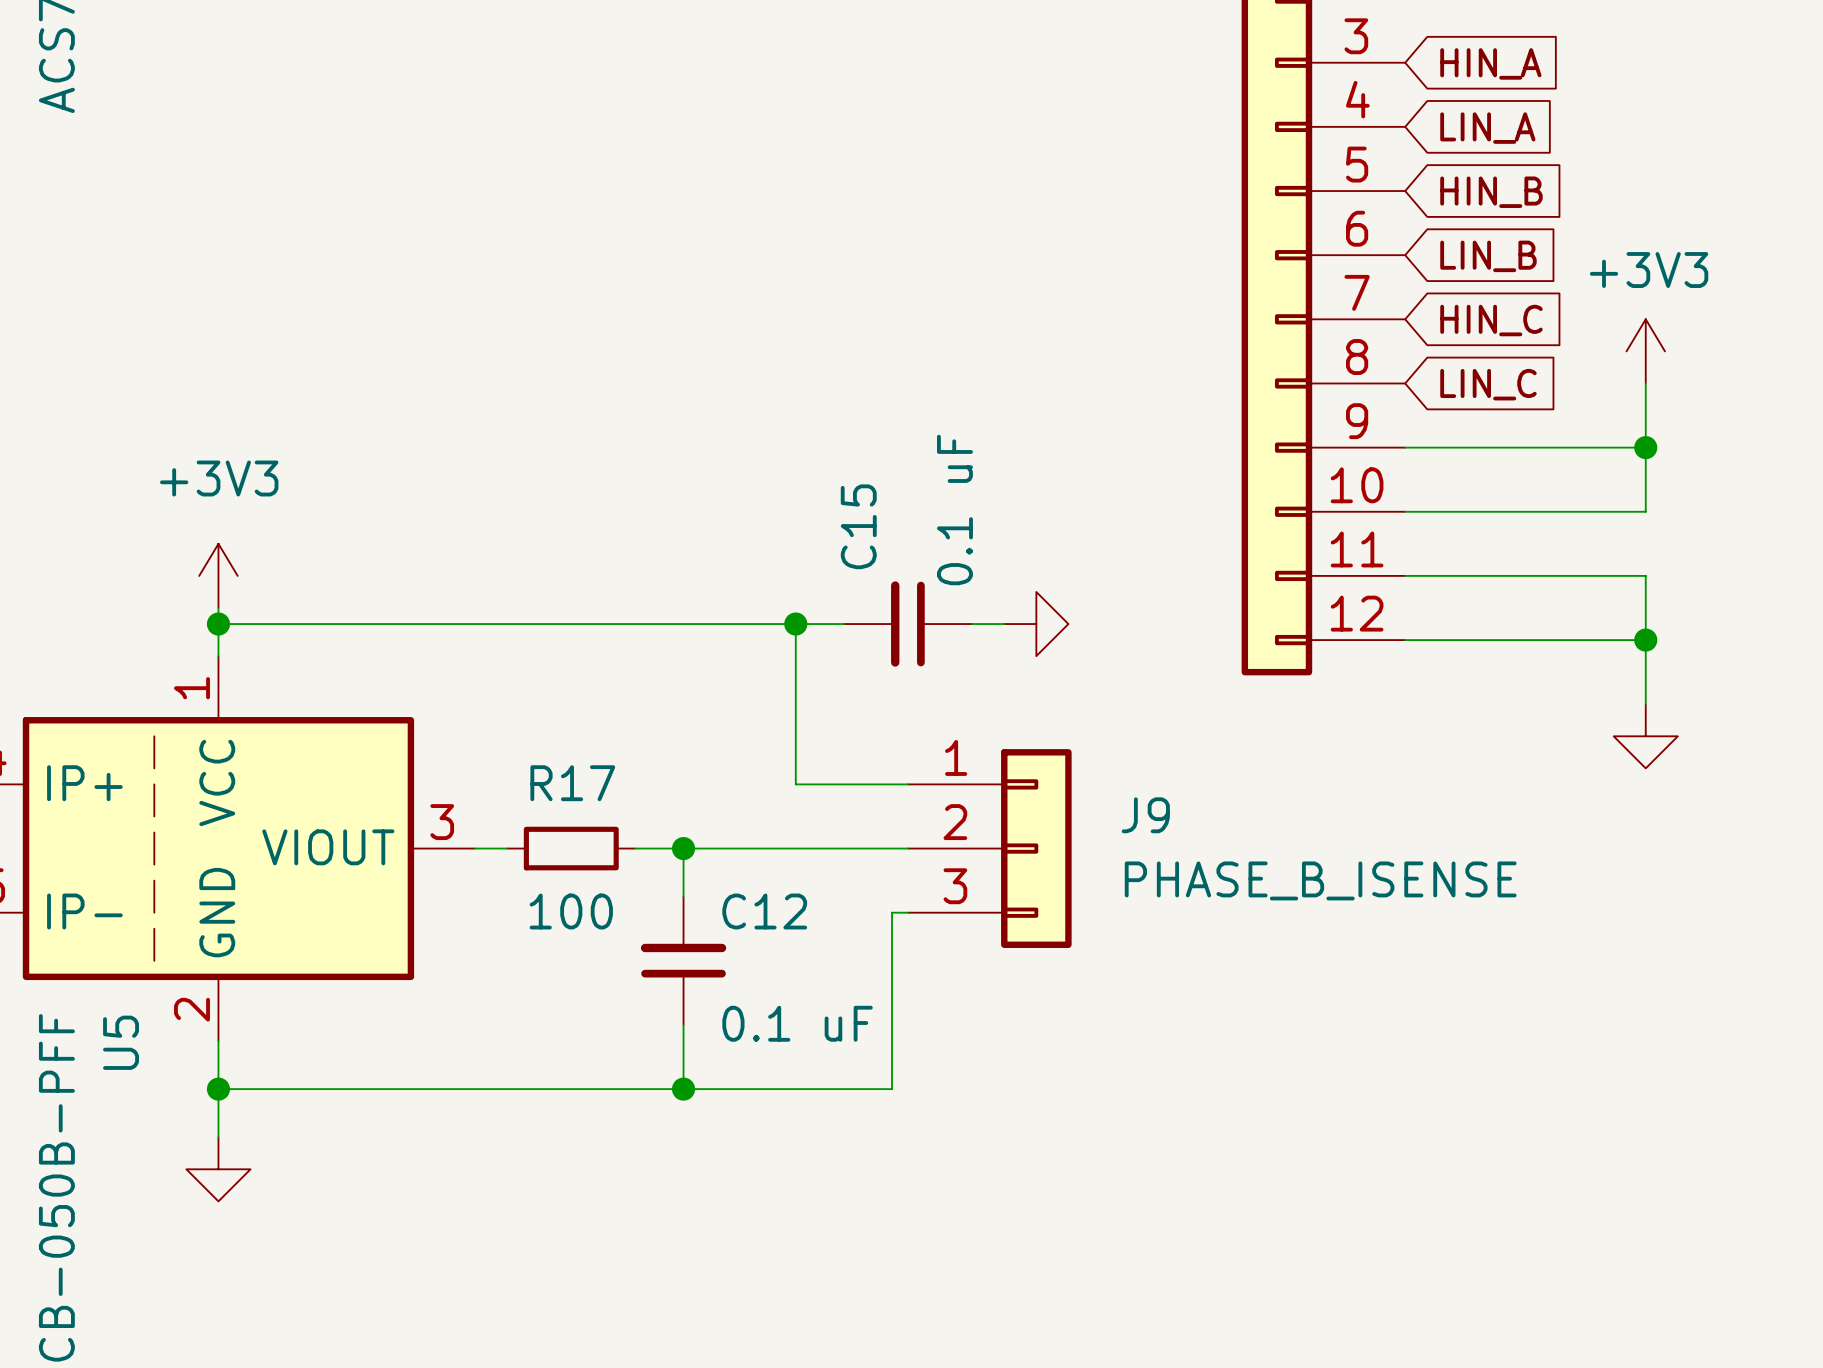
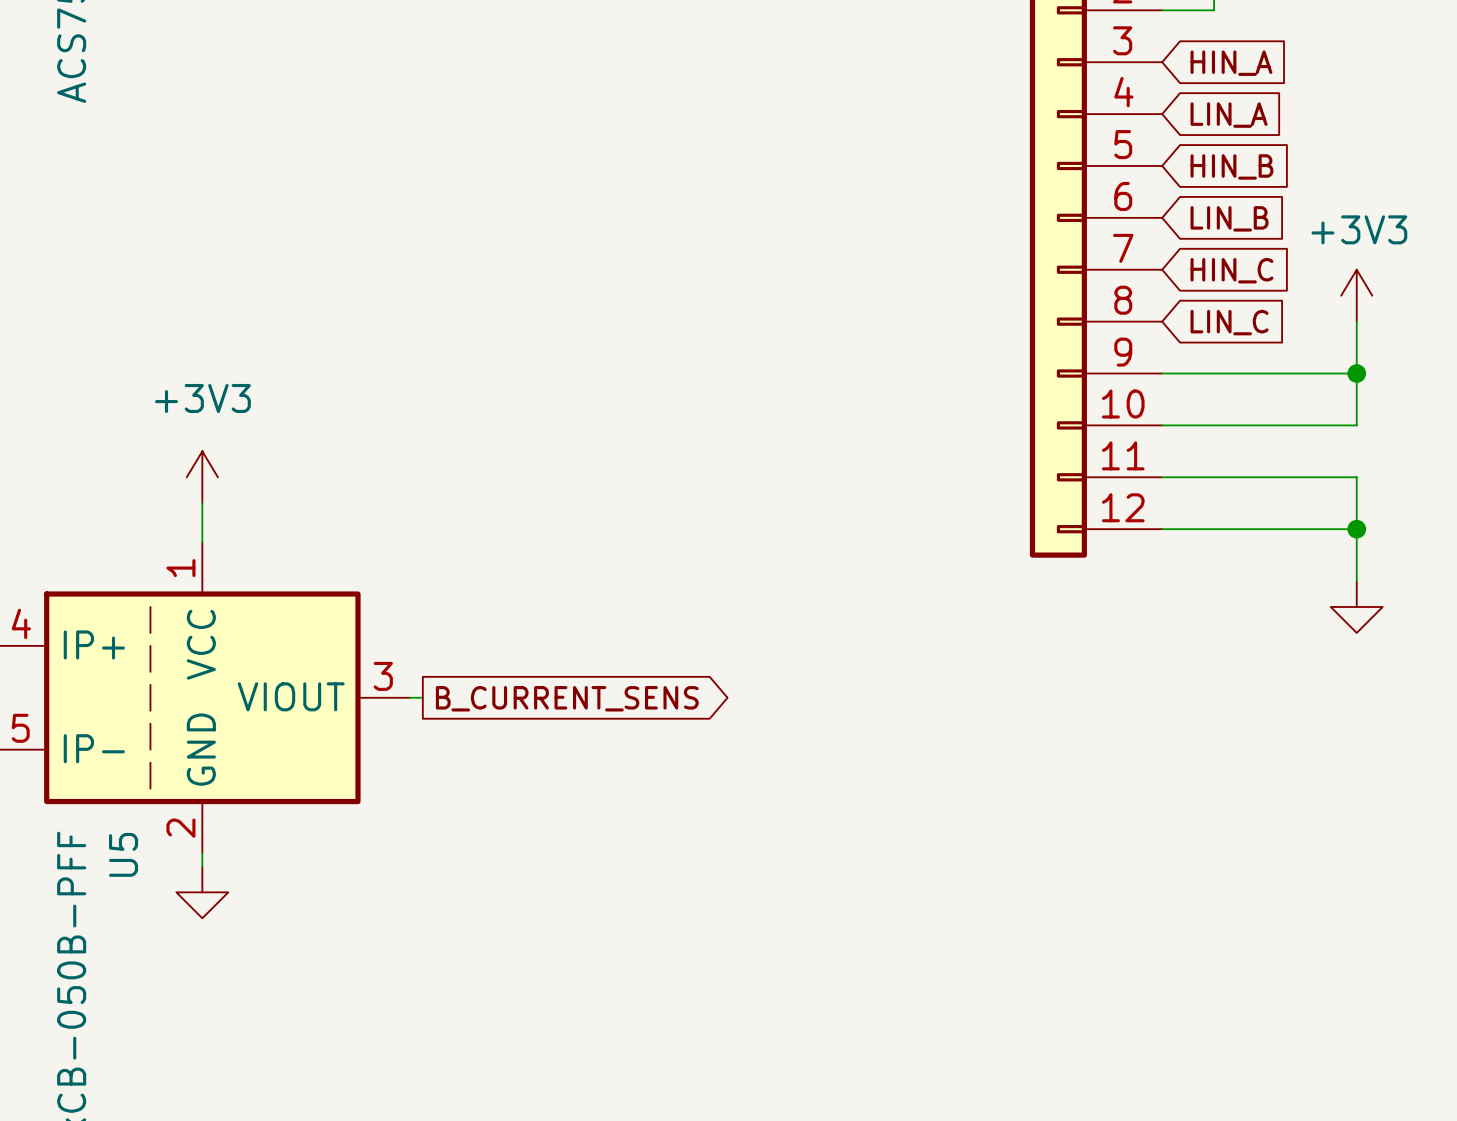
wire: (218, 624) (843, 624) -> none
junction: (218, 624) -> none
wire: (795, 624) (795, 784) (908, 784) -> none
junction: (795, 624) -> none
C15: 0.1 uF (908, 624) -> none
wire: (972, 624) (1004, 624) -> none
power symbol: (1036, 624) -> none
wire: (491, 848) (507, 848) -> none
R17: 100 (571, 848) -> none
wire: (635, 848) (908, 848) -> none
wire: (683, 848) (683, 896) -> none
junction: (683, 848) -> none
J9: PHASE_B_ISENSE (989, 848) -> none
global label: none -> B_CURRENT_SENS (567, 698)
wire: (908, 912) (892, 912) (892, 1089) (218, 1089) -> none
C12: 0.1 uF (683, 960) -> none
wire: (683, 1024) (683, 1089) -> none
wire: (218, 1057) (218, 1137) -> none
junction: (218, 1089) -> none
junction: (683, 1089) -> none
power symbol position: (218, 1169) -> (202, 892)

